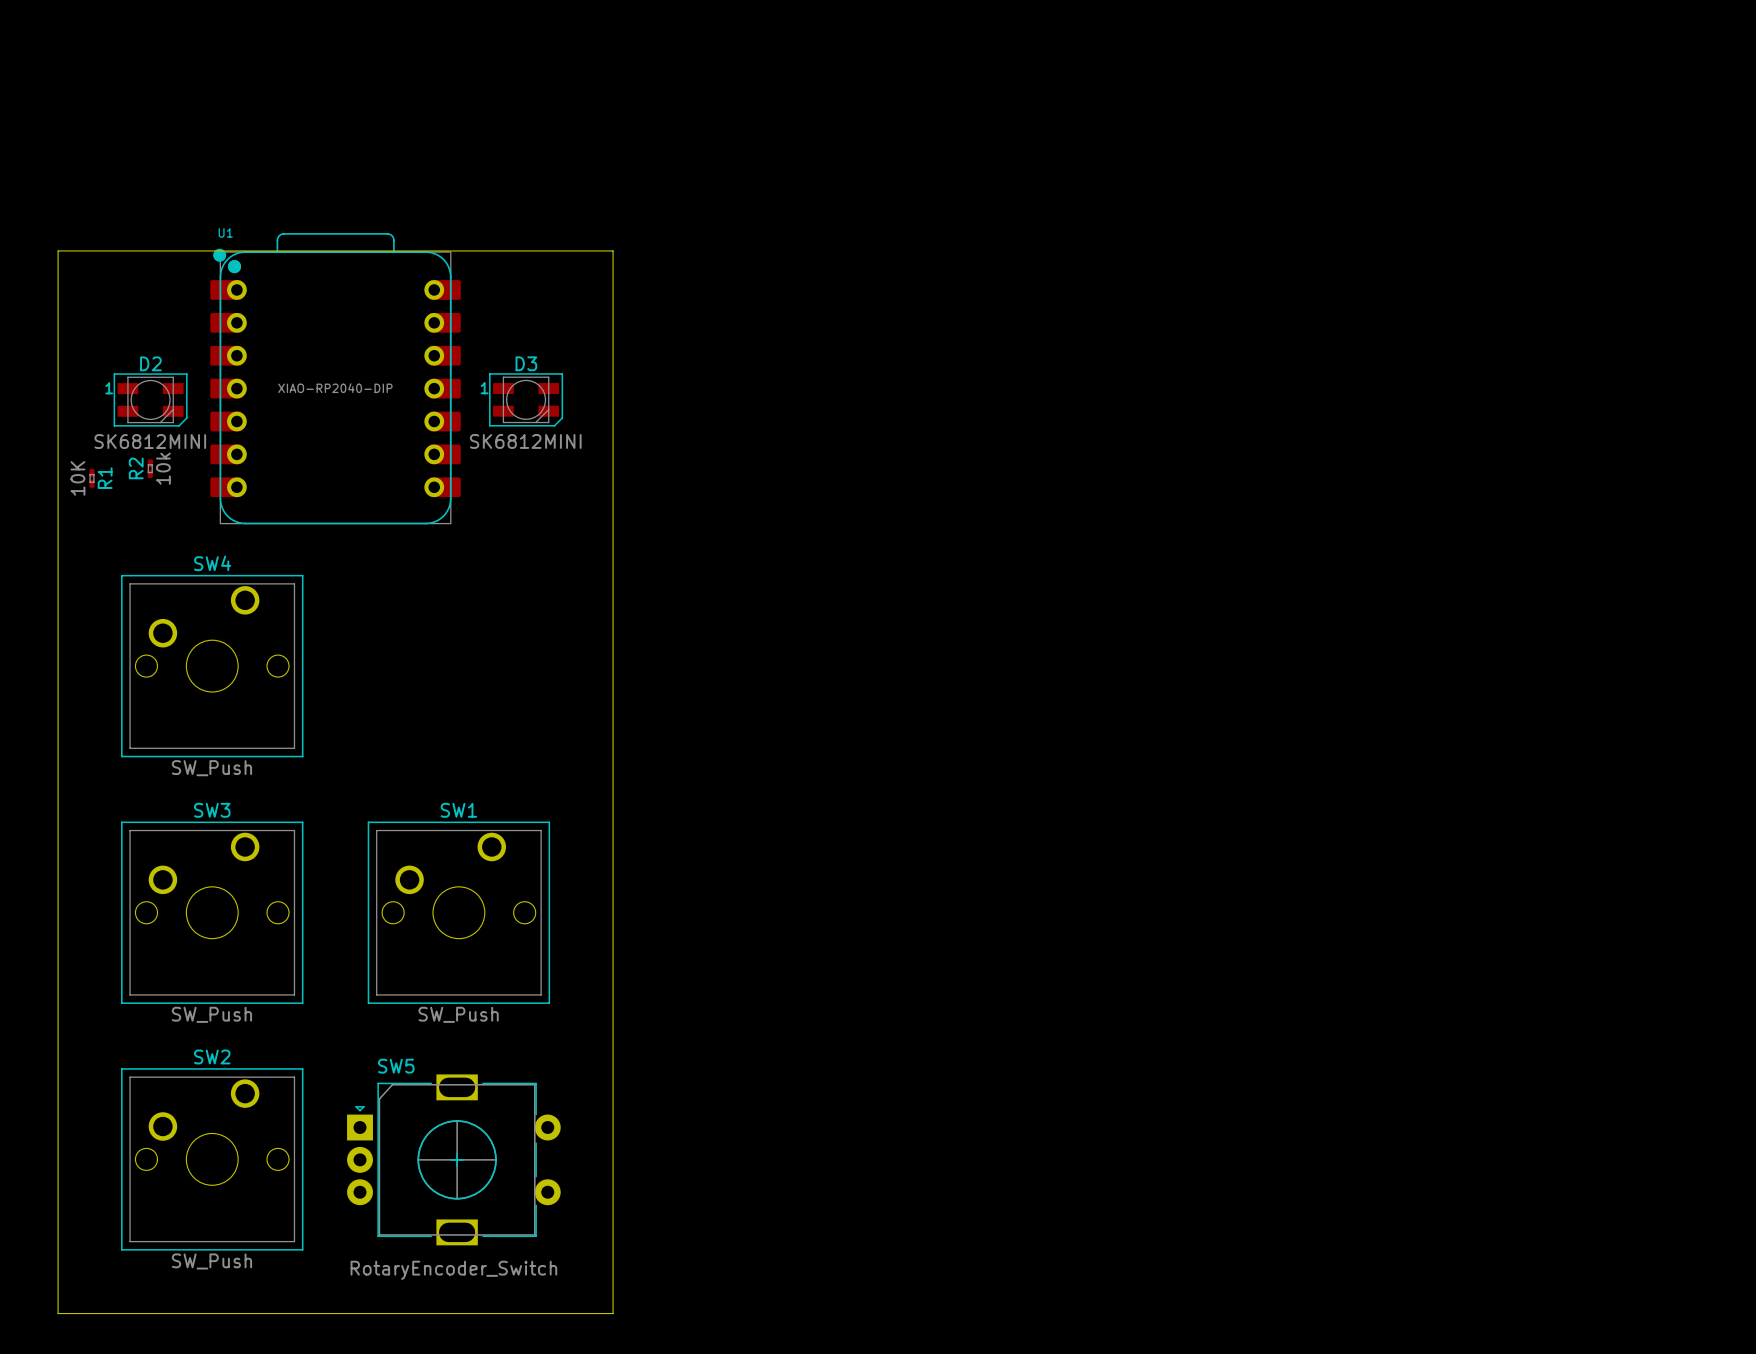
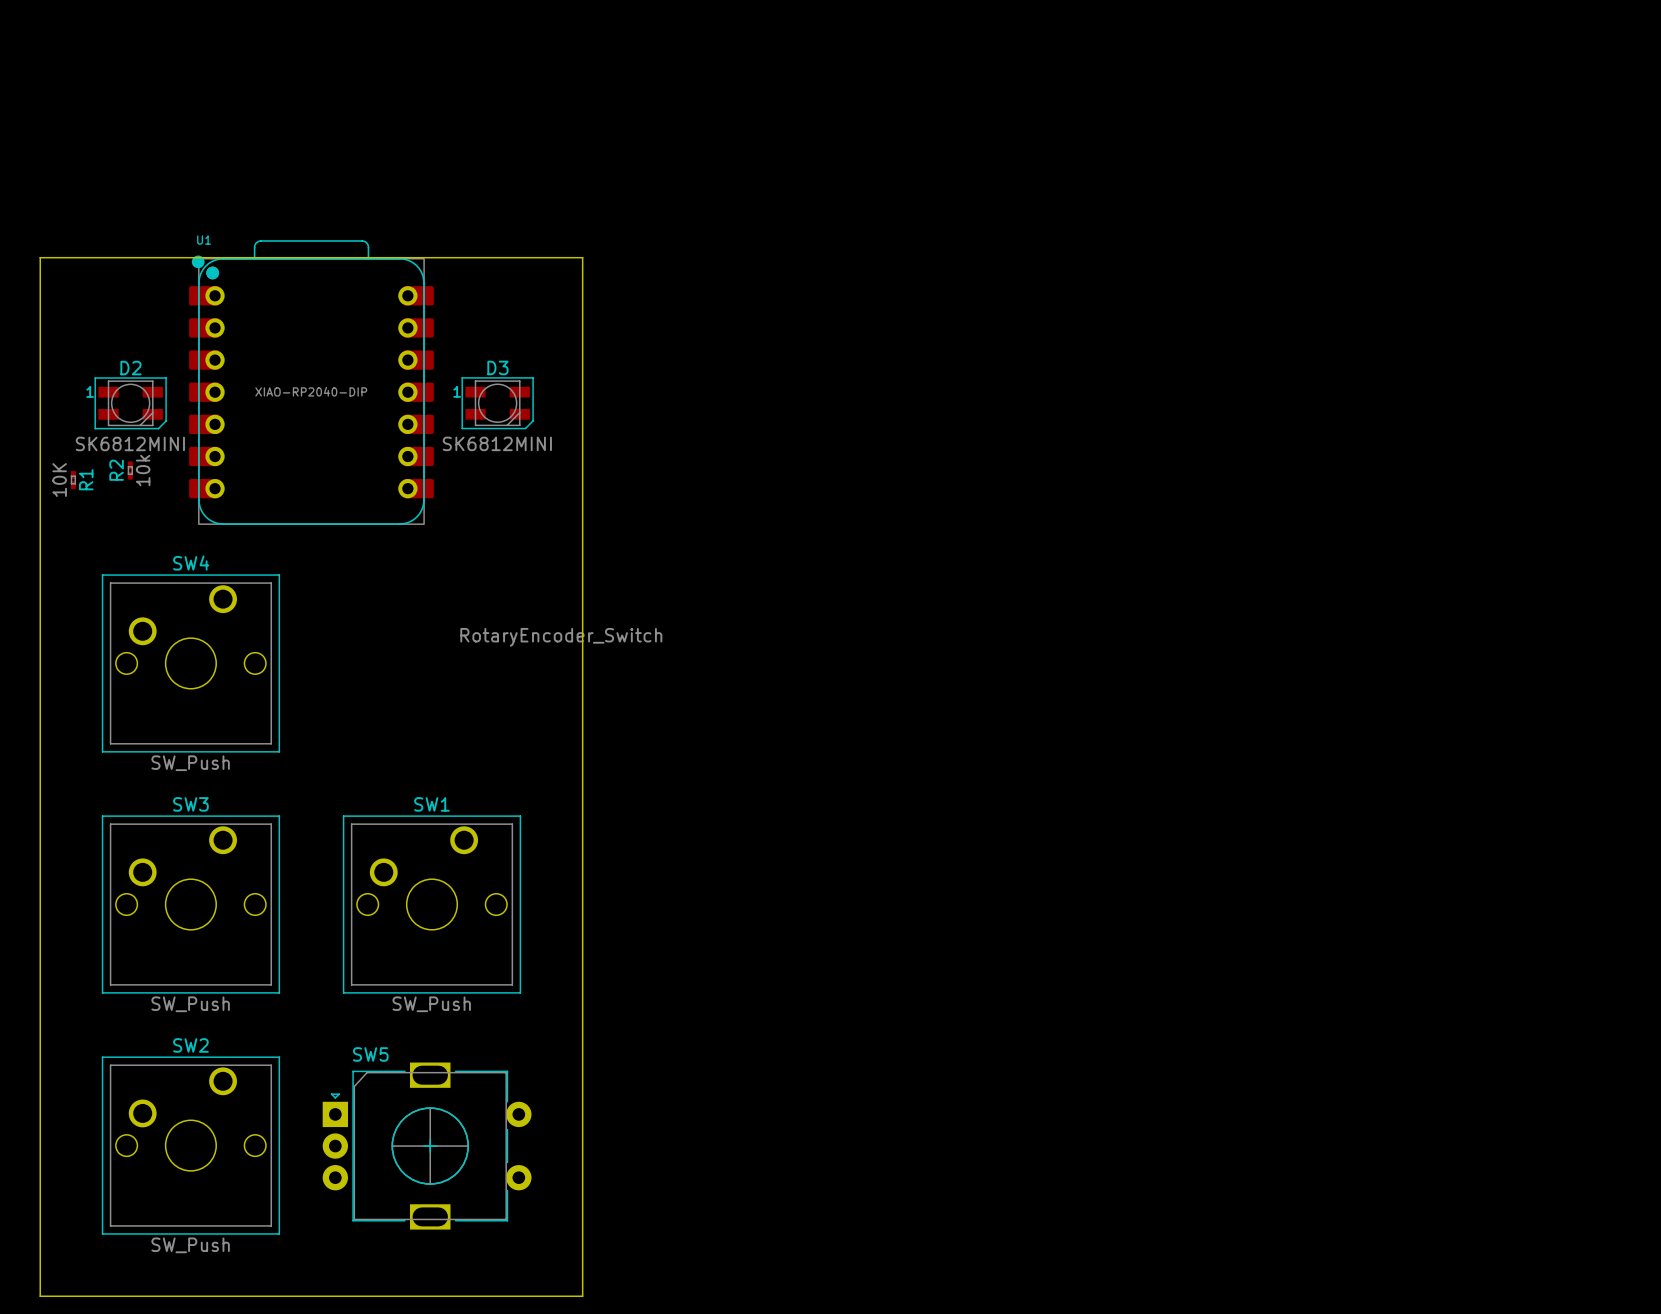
SW5 value position: RotaryEncoder_Switch (453, 1270) -> RotaryEncoder_Switch (561, 637)

